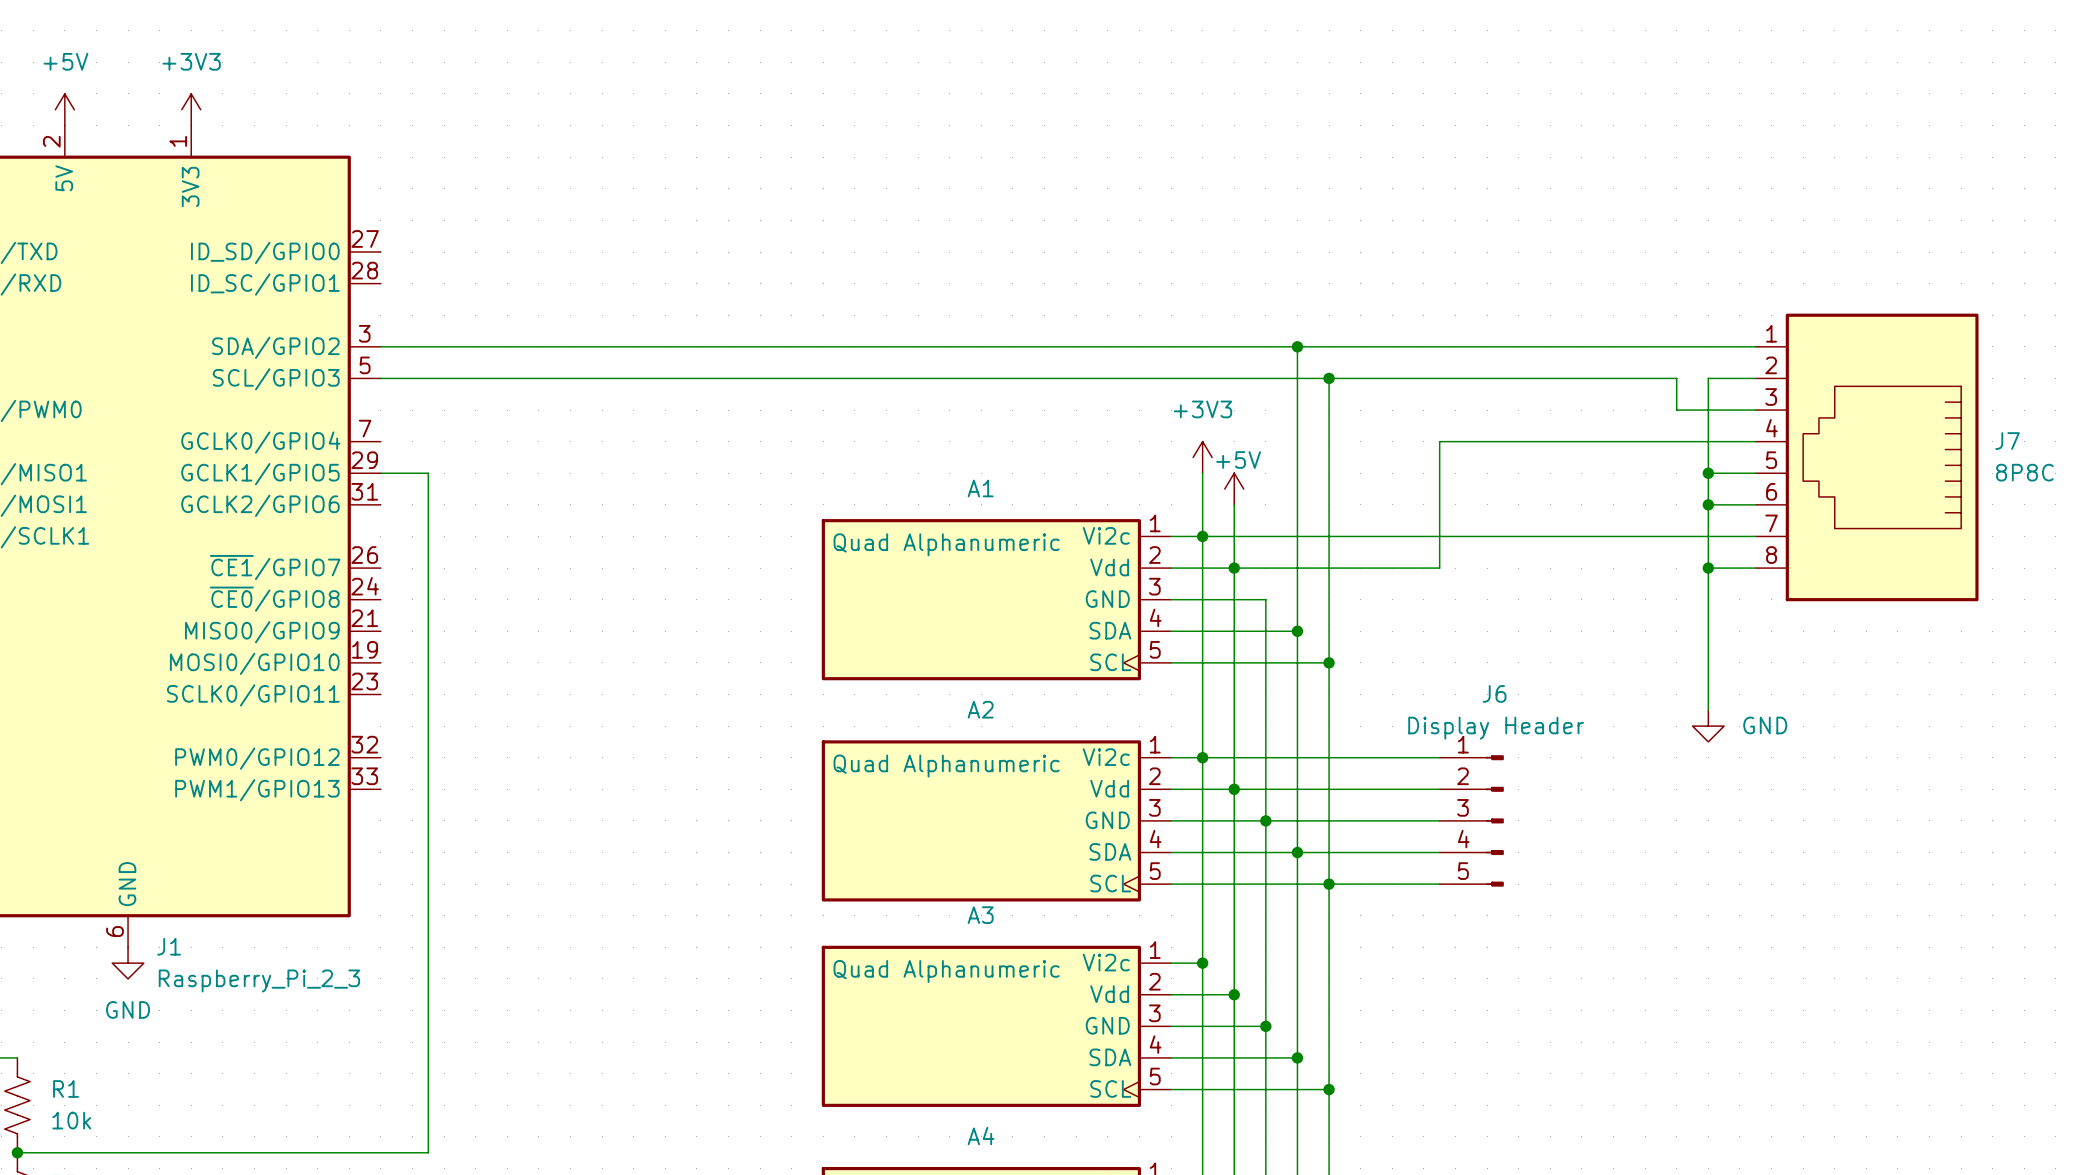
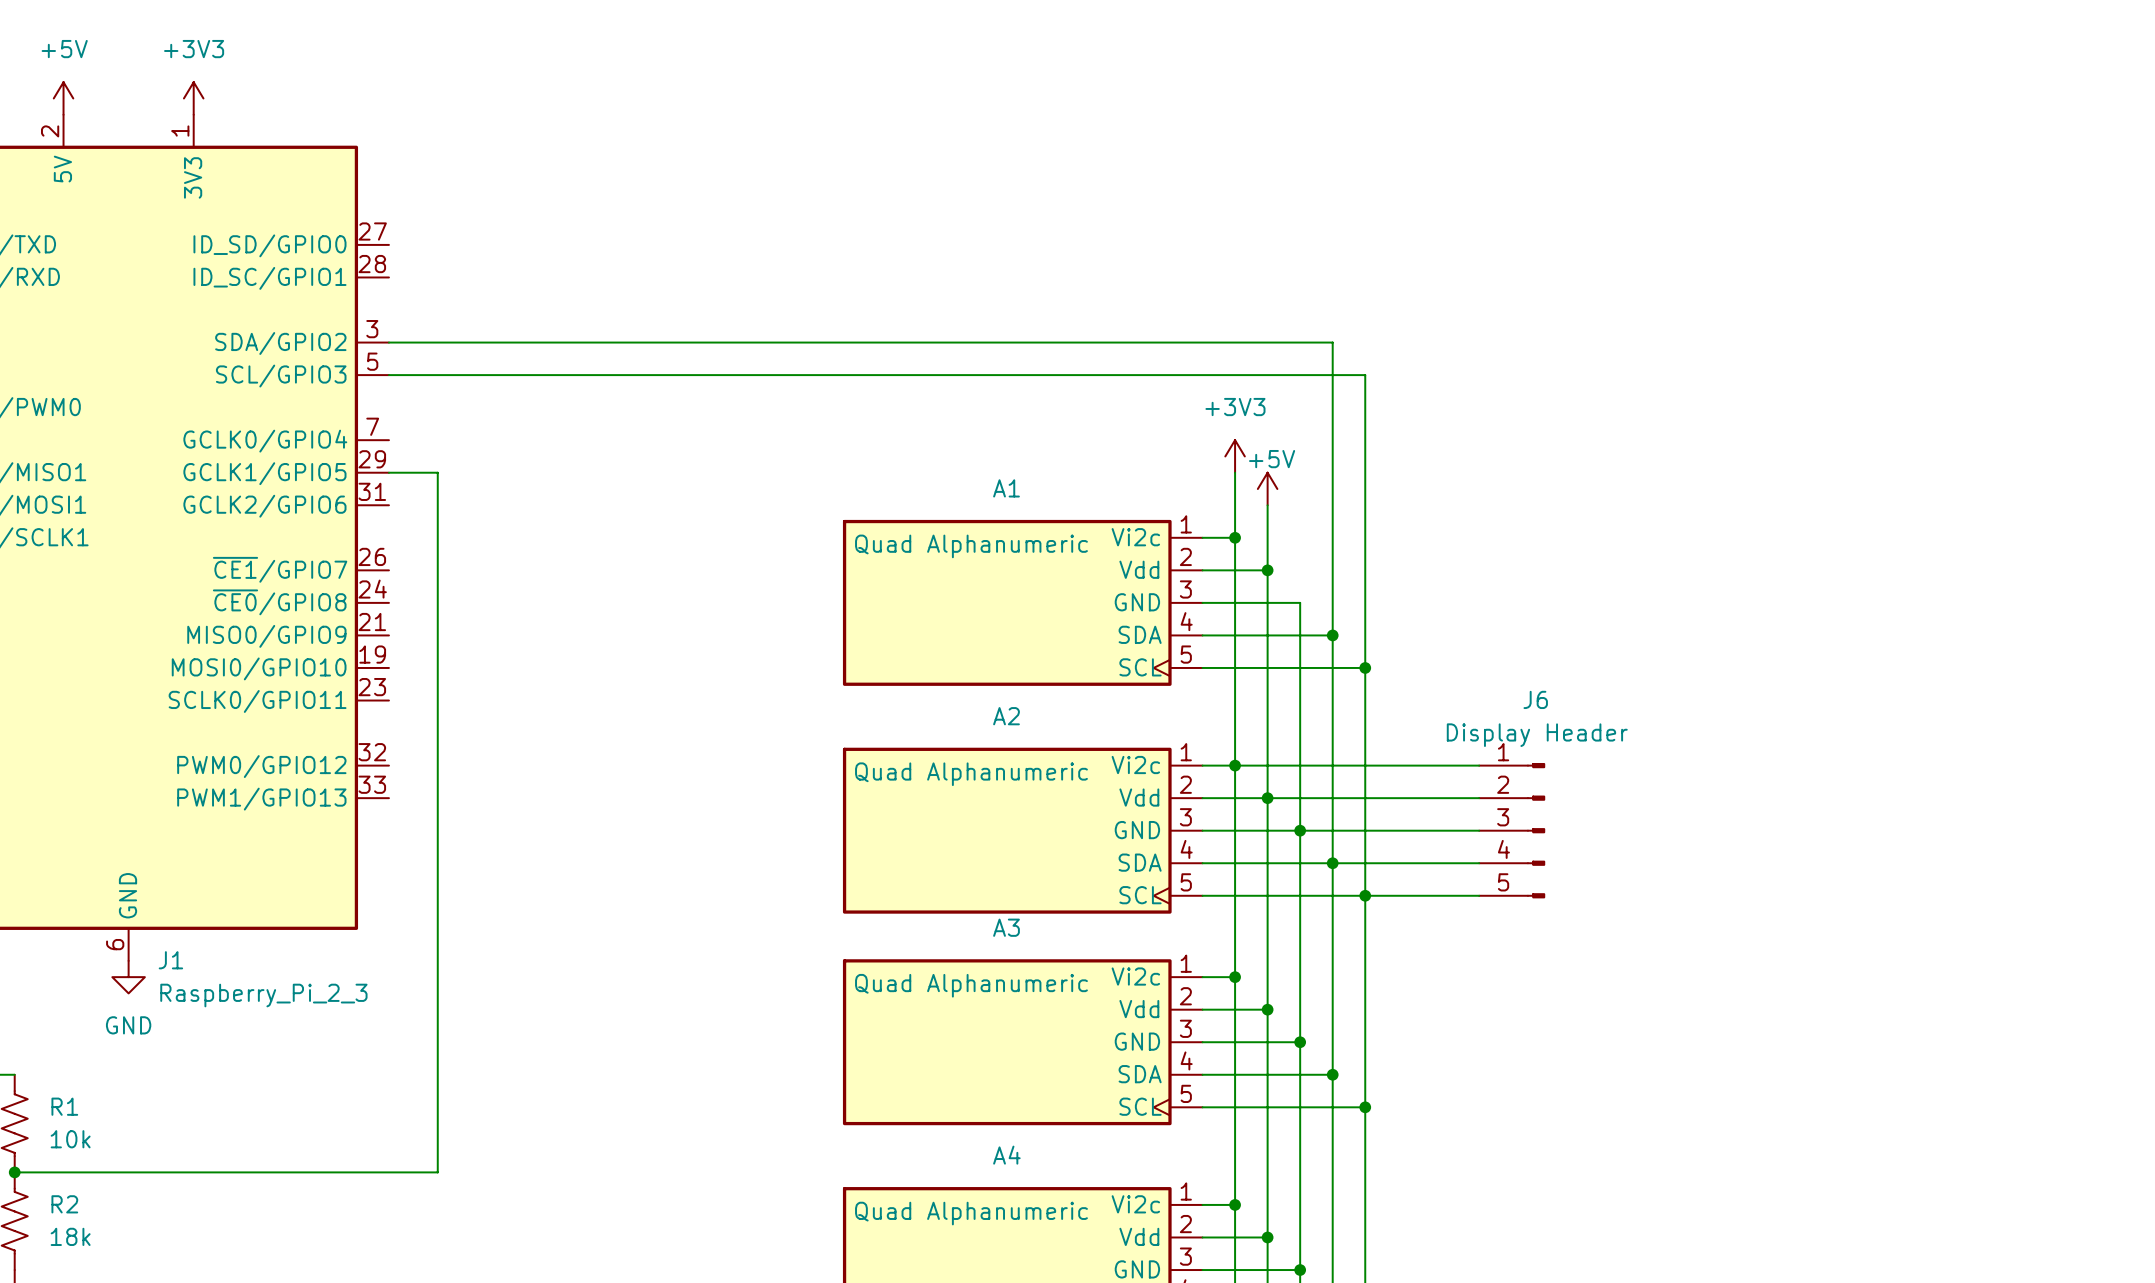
wire: (1297, 346) (1755, 346) -> none
junction: (1297, 346) -> none
wire: (1329, 378) (1676, 378) (1676, 410) (1755, 410) -> none
junction: (1329, 378) -> none
wire: (1755, 378) (1708, 378) (1708, 710) -> none
wire: (1755, 441) (1439, 441) (1439, 568) (1234, 568) -> none
J7: 8P8C (1867, 457) -> none
wire: (1708, 473) (1755, 473) -> none
junction: (1708, 473) -> none
wire: (1708, 504) (1755, 504) -> none
junction: (1708, 504) -> none
wire: (1202, 536) (1755, 536) -> none
wire: (1708, 568) (1755, 568) -> none
junction: (1708, 568) -> none
power symbol: GND (1708, 726) -> none

